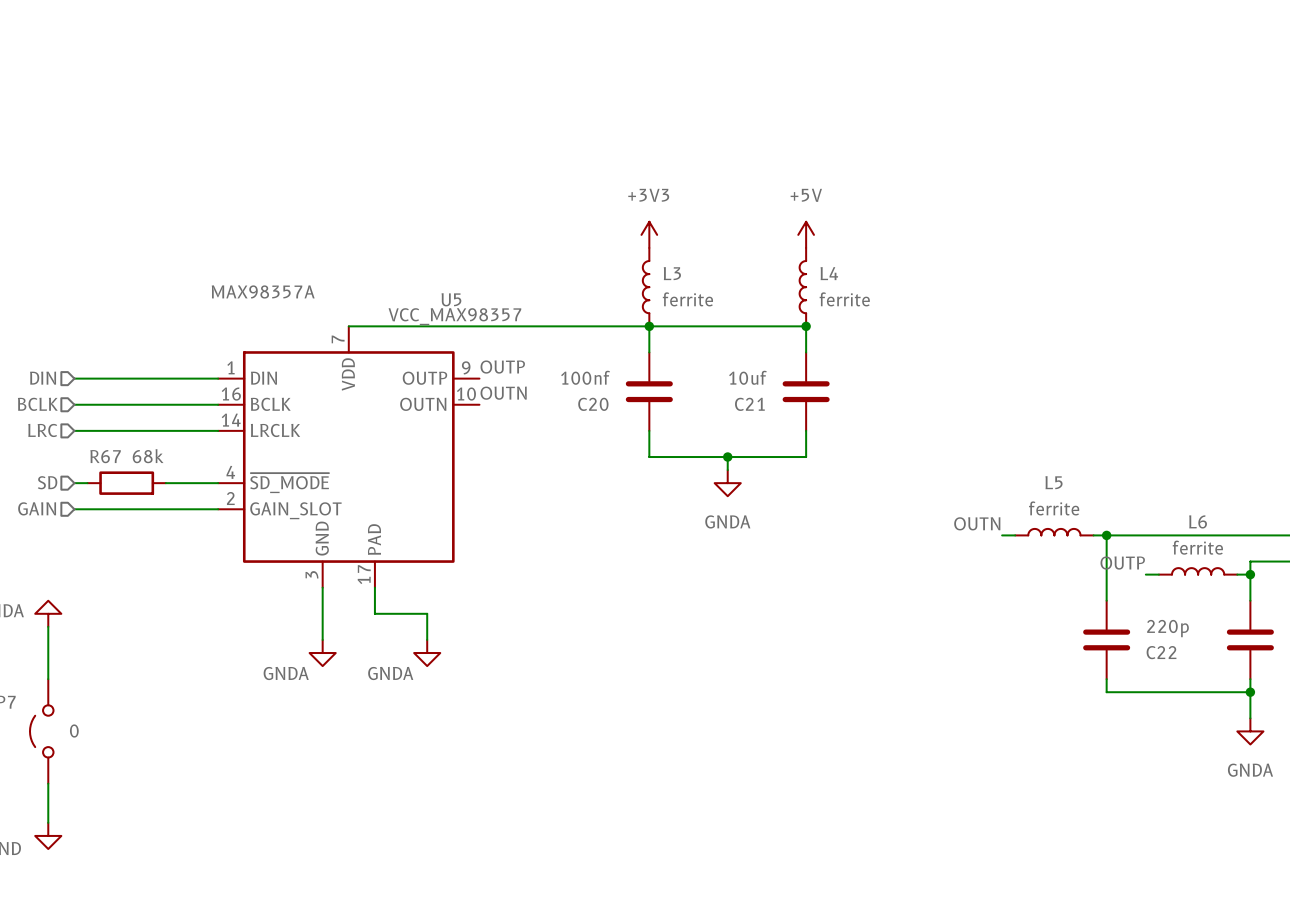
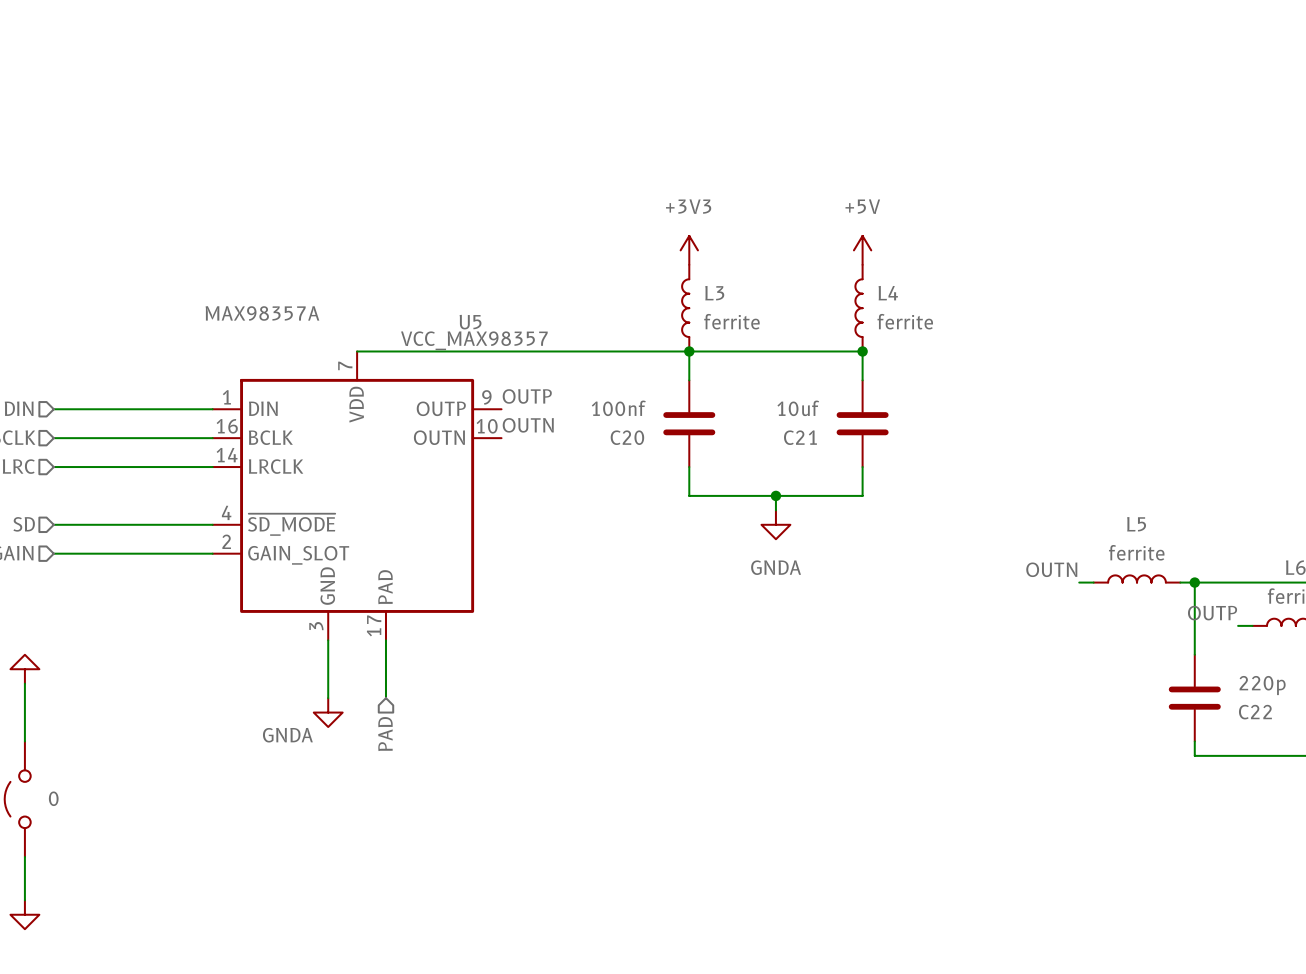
wire: none -> (68, 524) (154, 524)
R67: 68k (126, 483) -> none
wire: (374, 613) (427, 613) (427, 639) -> (385, 669) (385, 698)
power symbol: GNDA (427, 653) -> none
hierarchical label: none -> PAD (385, 734)

